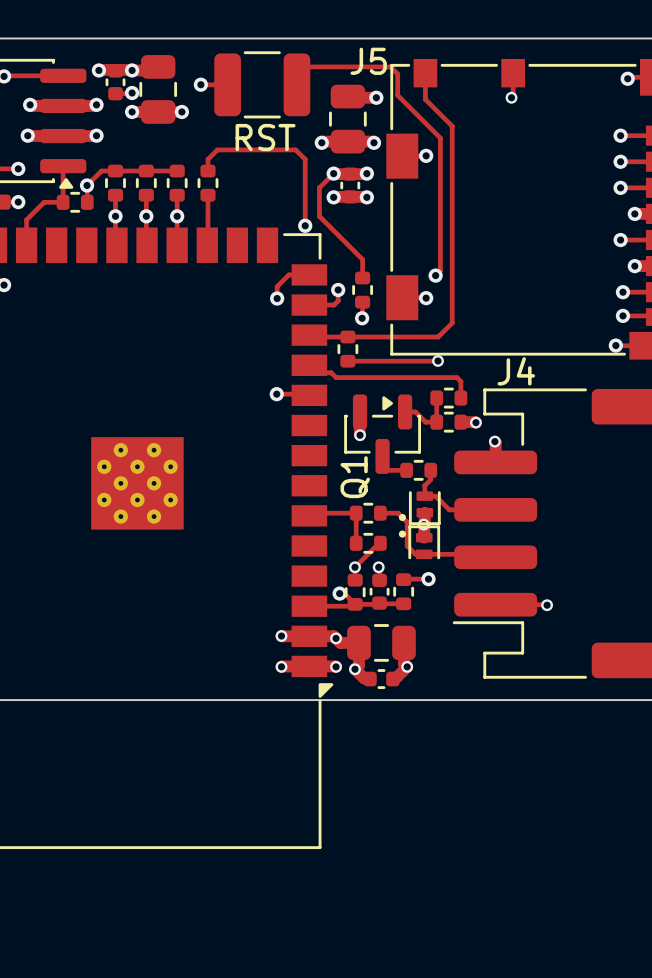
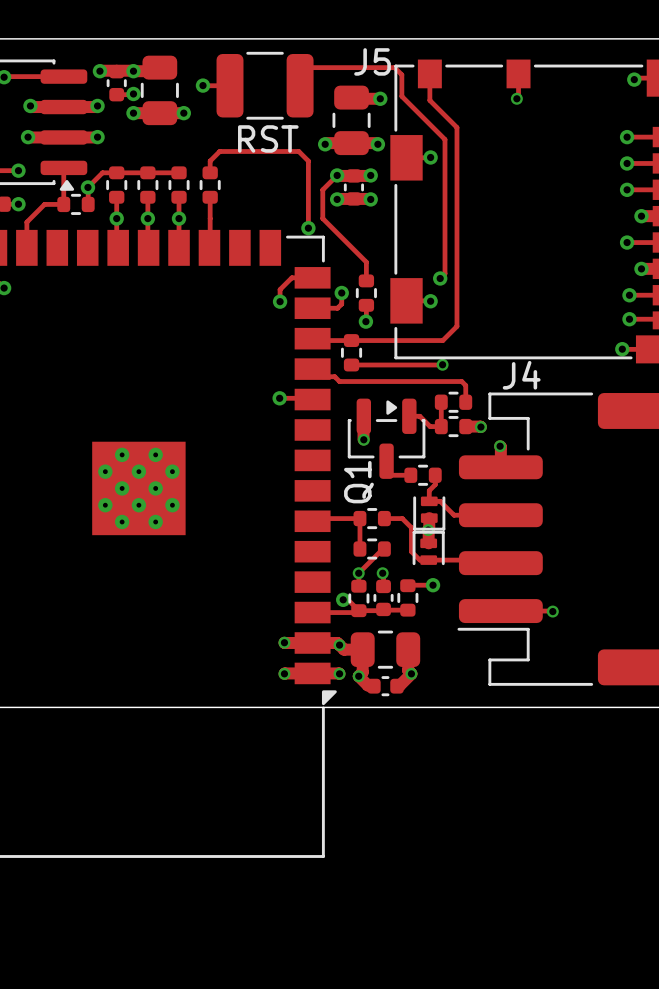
drawing: [398, 513, 406, 538] -> none

